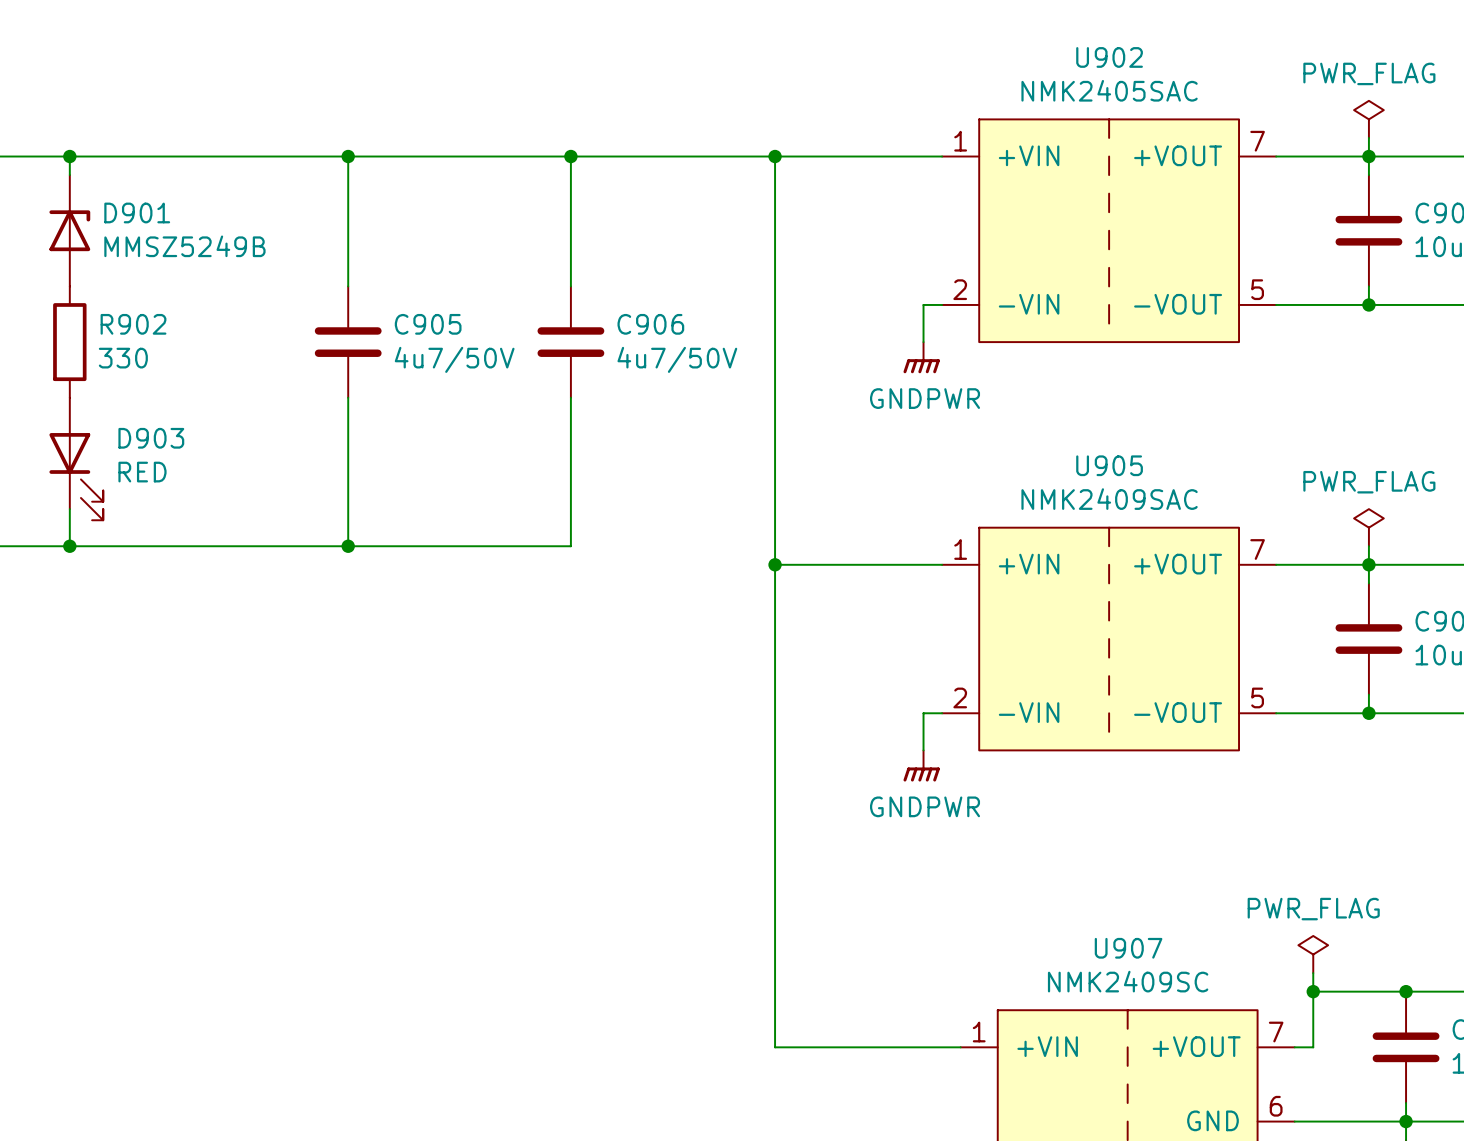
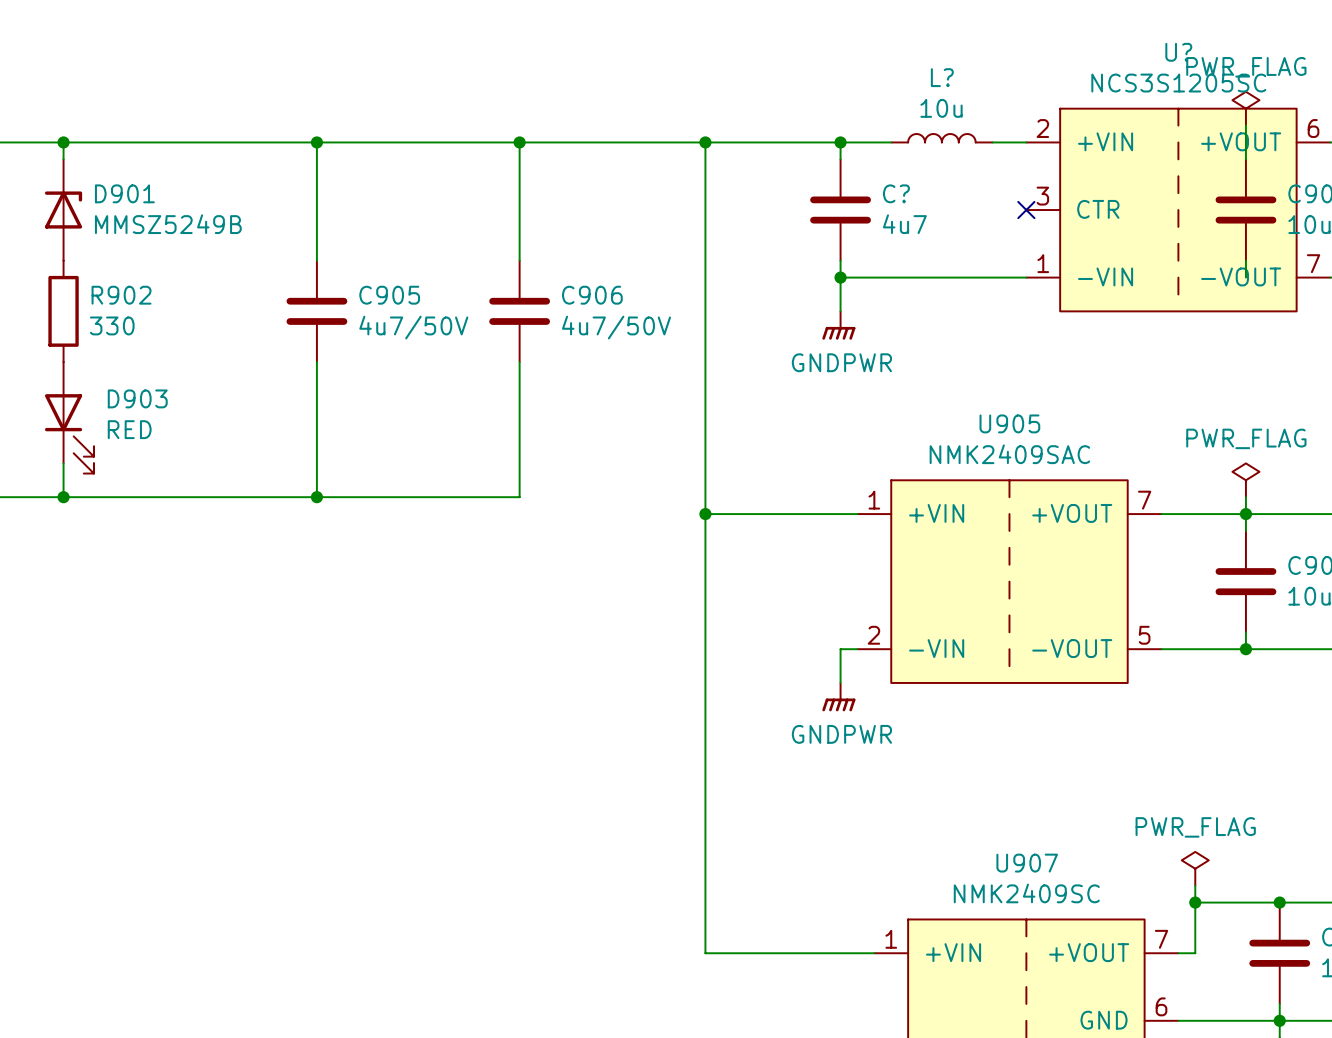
L?: none -> 10u (941, 138)
wire: none -> (840, 142) (840, 159)
junction: none -> (840, 142)
junction: (1368, 156) -> none
C?: none -> 4u7 (840, 210)
U902: NMK2405SAC (1109, 230) -> none
no-connect mark: none -> (1026, 210)
U?: none -> NCS3S1205SC (1178, 210)
wire: none -> (840, 260) (840, 277)
junction: none -> (840, 277)
junction: (1368, 304) -> none

